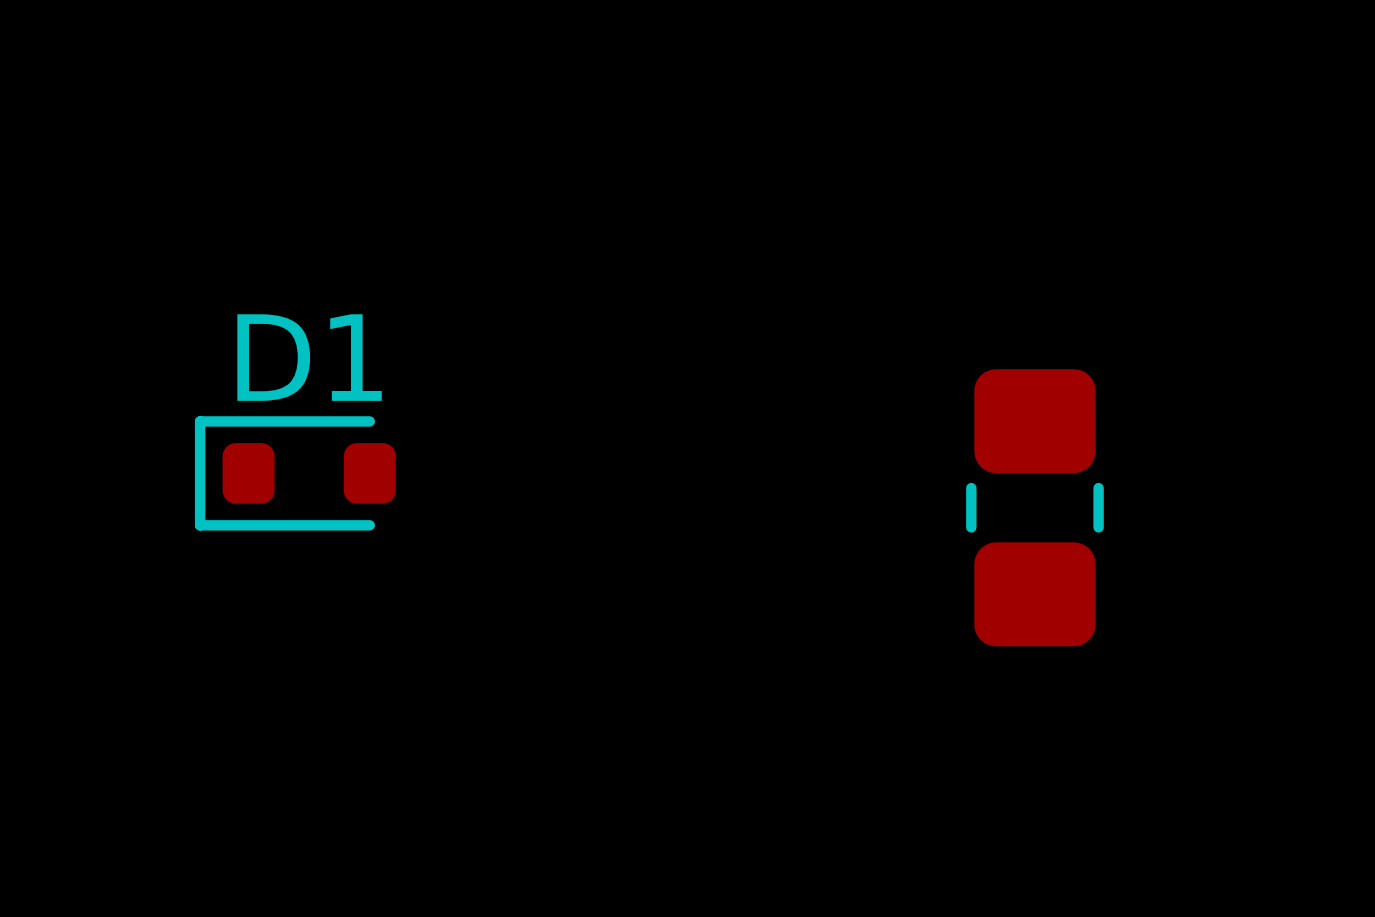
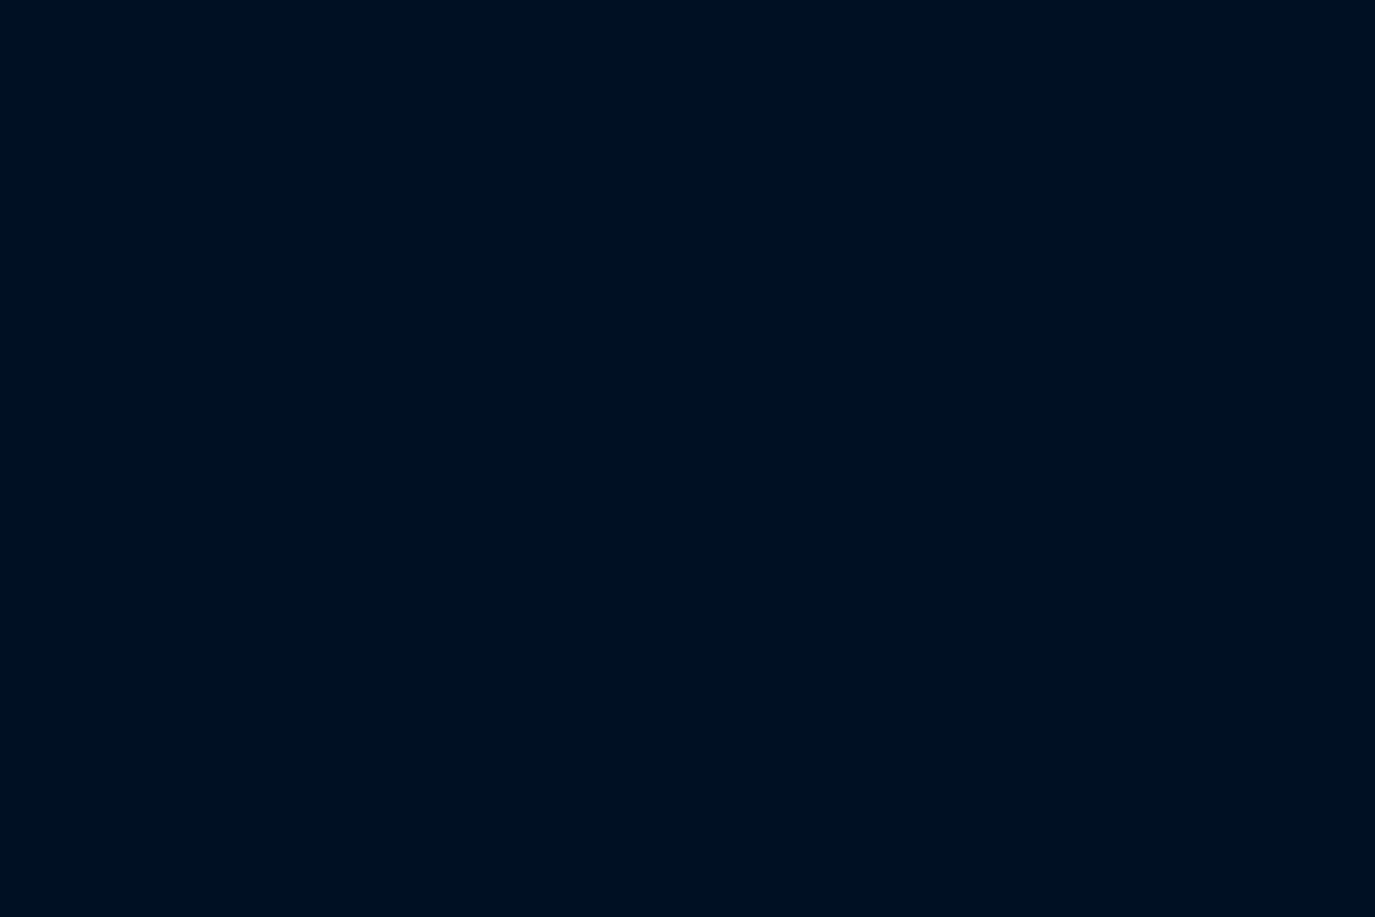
D1: (295, 473) -> none
part: (1034, 507) -> none

